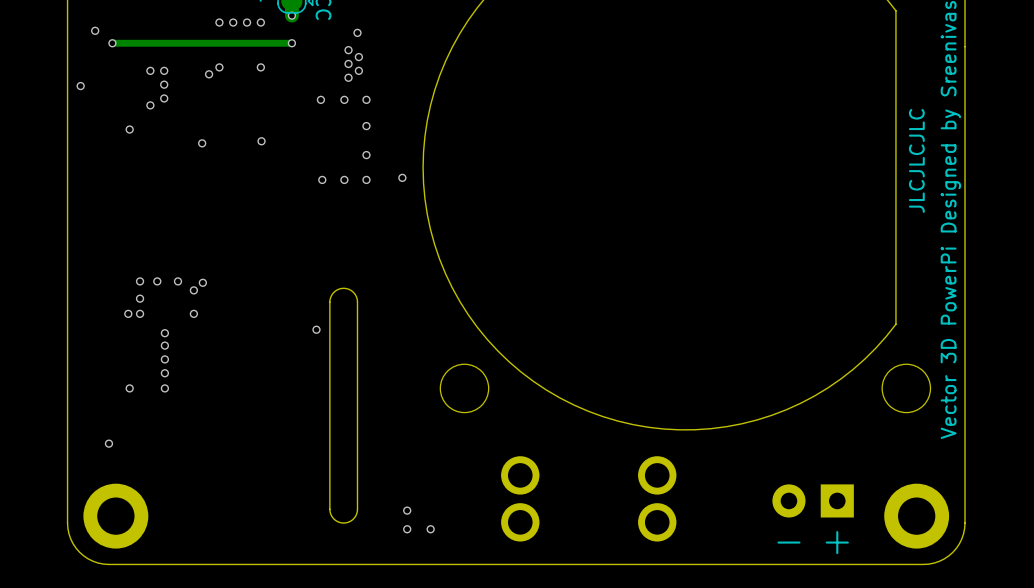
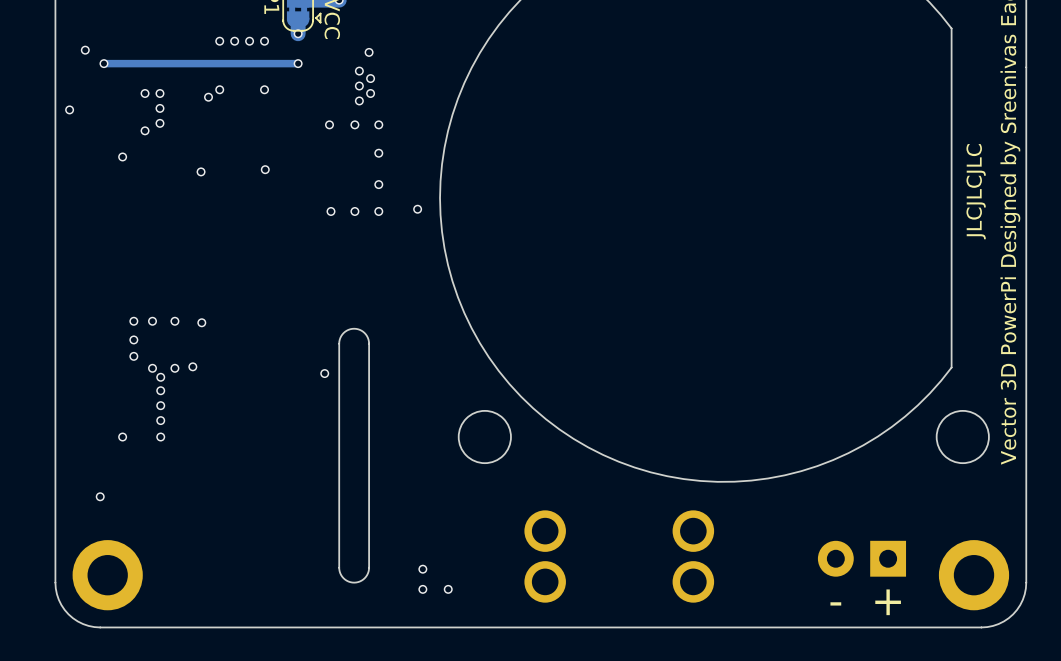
via: (193, 290) -> none
via: (128, 313) -> none
via: (193, 313) -> none
via: none -> (192, 366)
via: none -> (152, 368)
via: none -> (174, 368)

